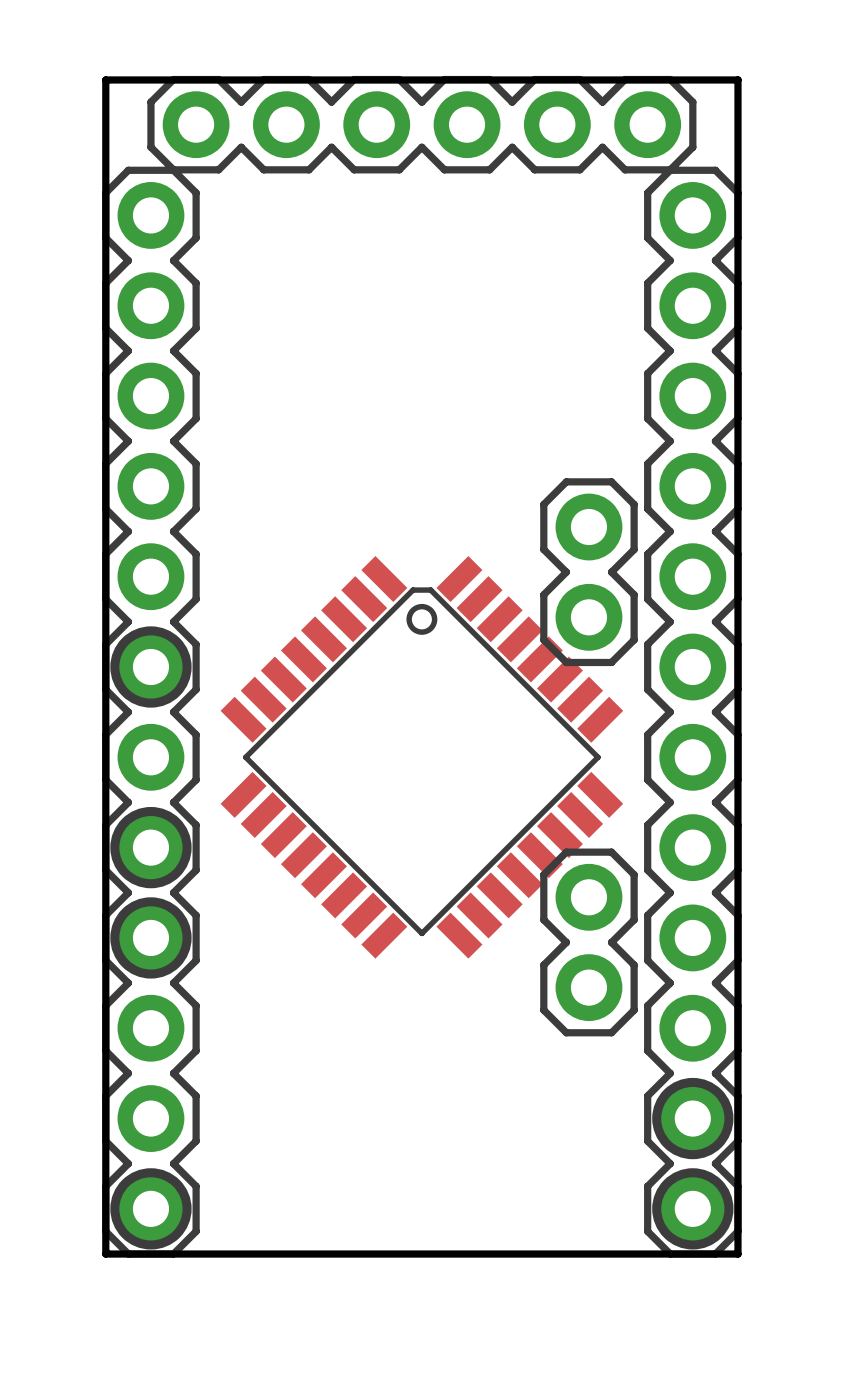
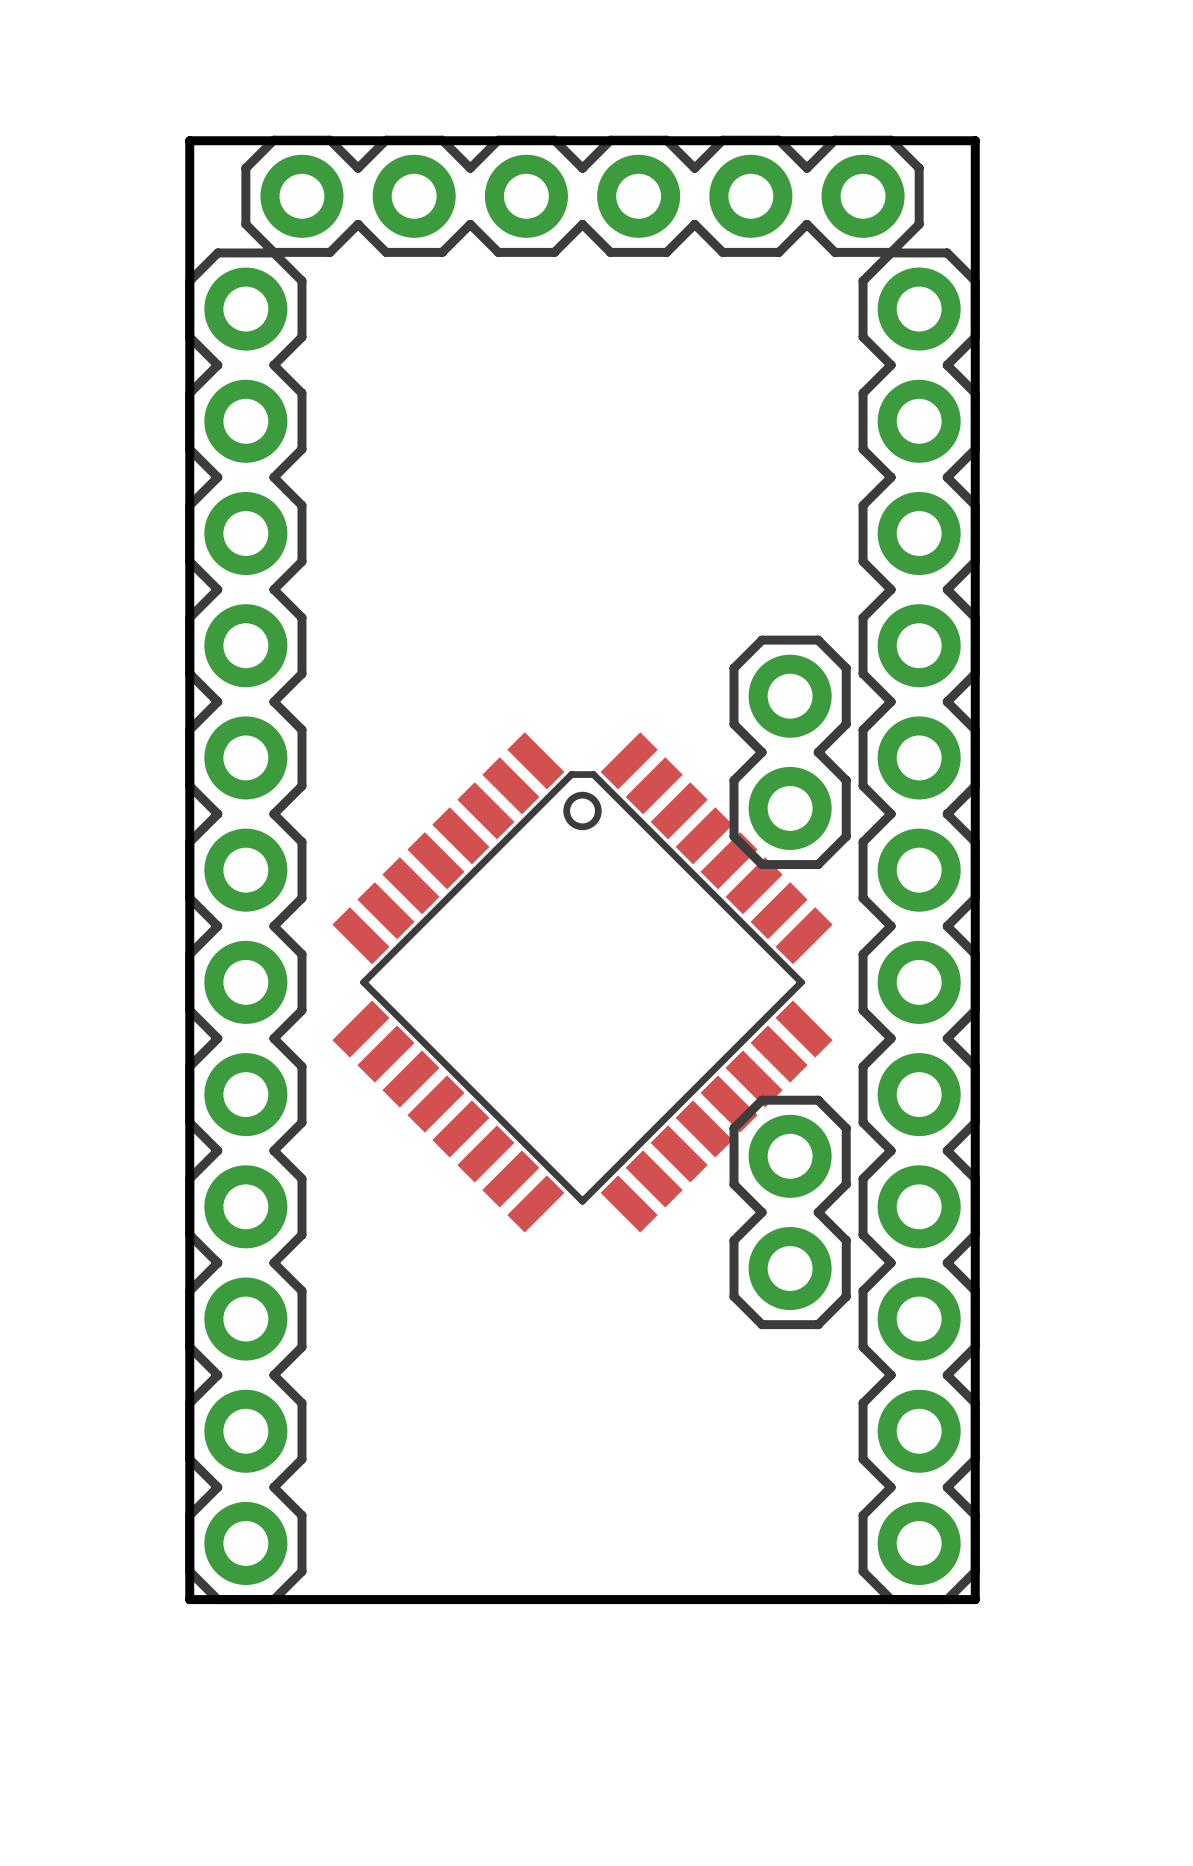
drawing: [110, 626, 192, 708] -> none
drawing: [110, 806, 192, 979] -> none
drawing: [652, 1077, 734, 1250] -> none
drawing: [110, 1168, 192, 1250] -> none

